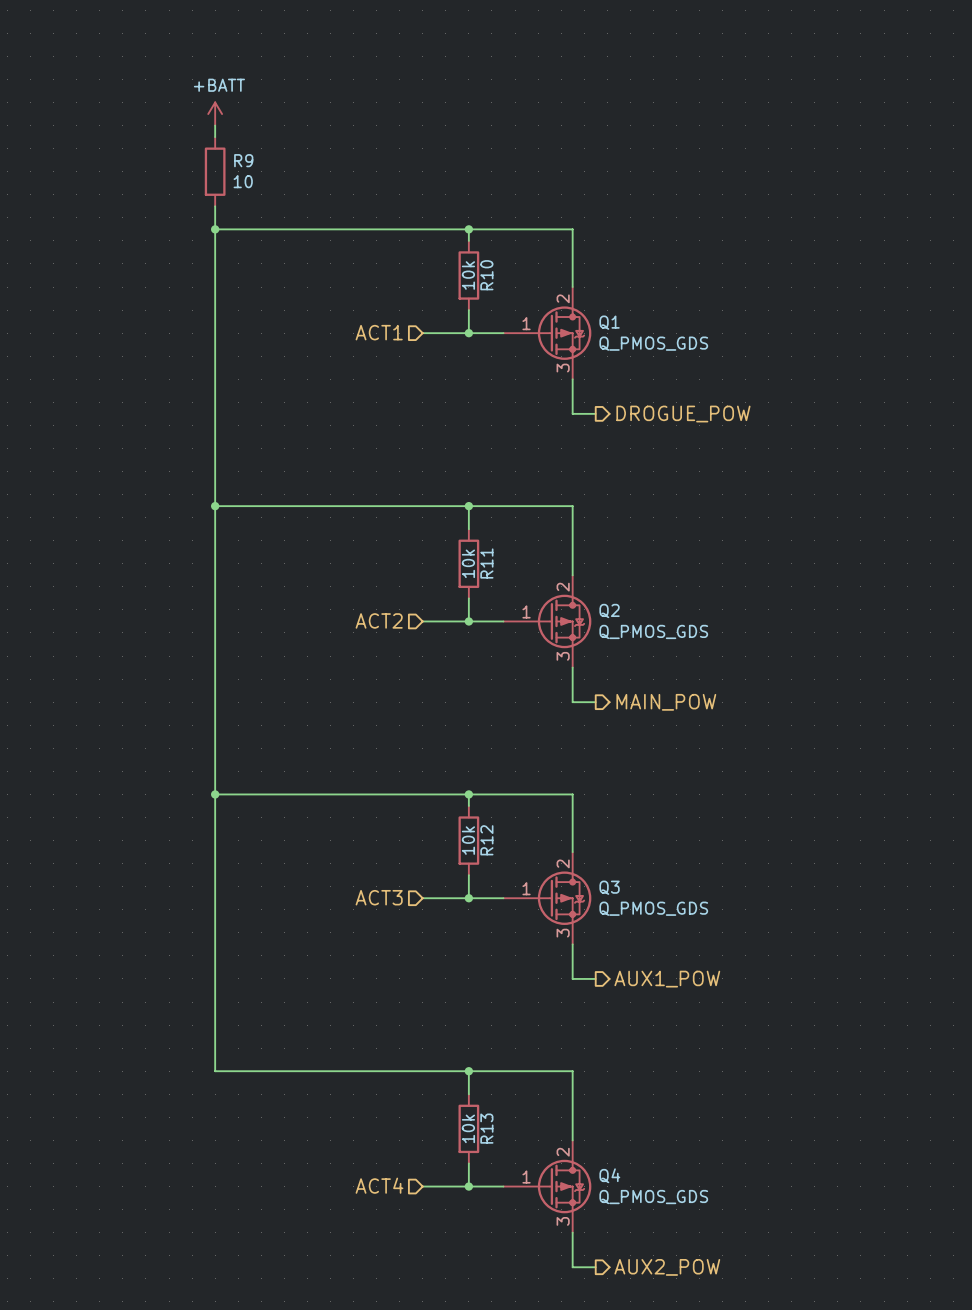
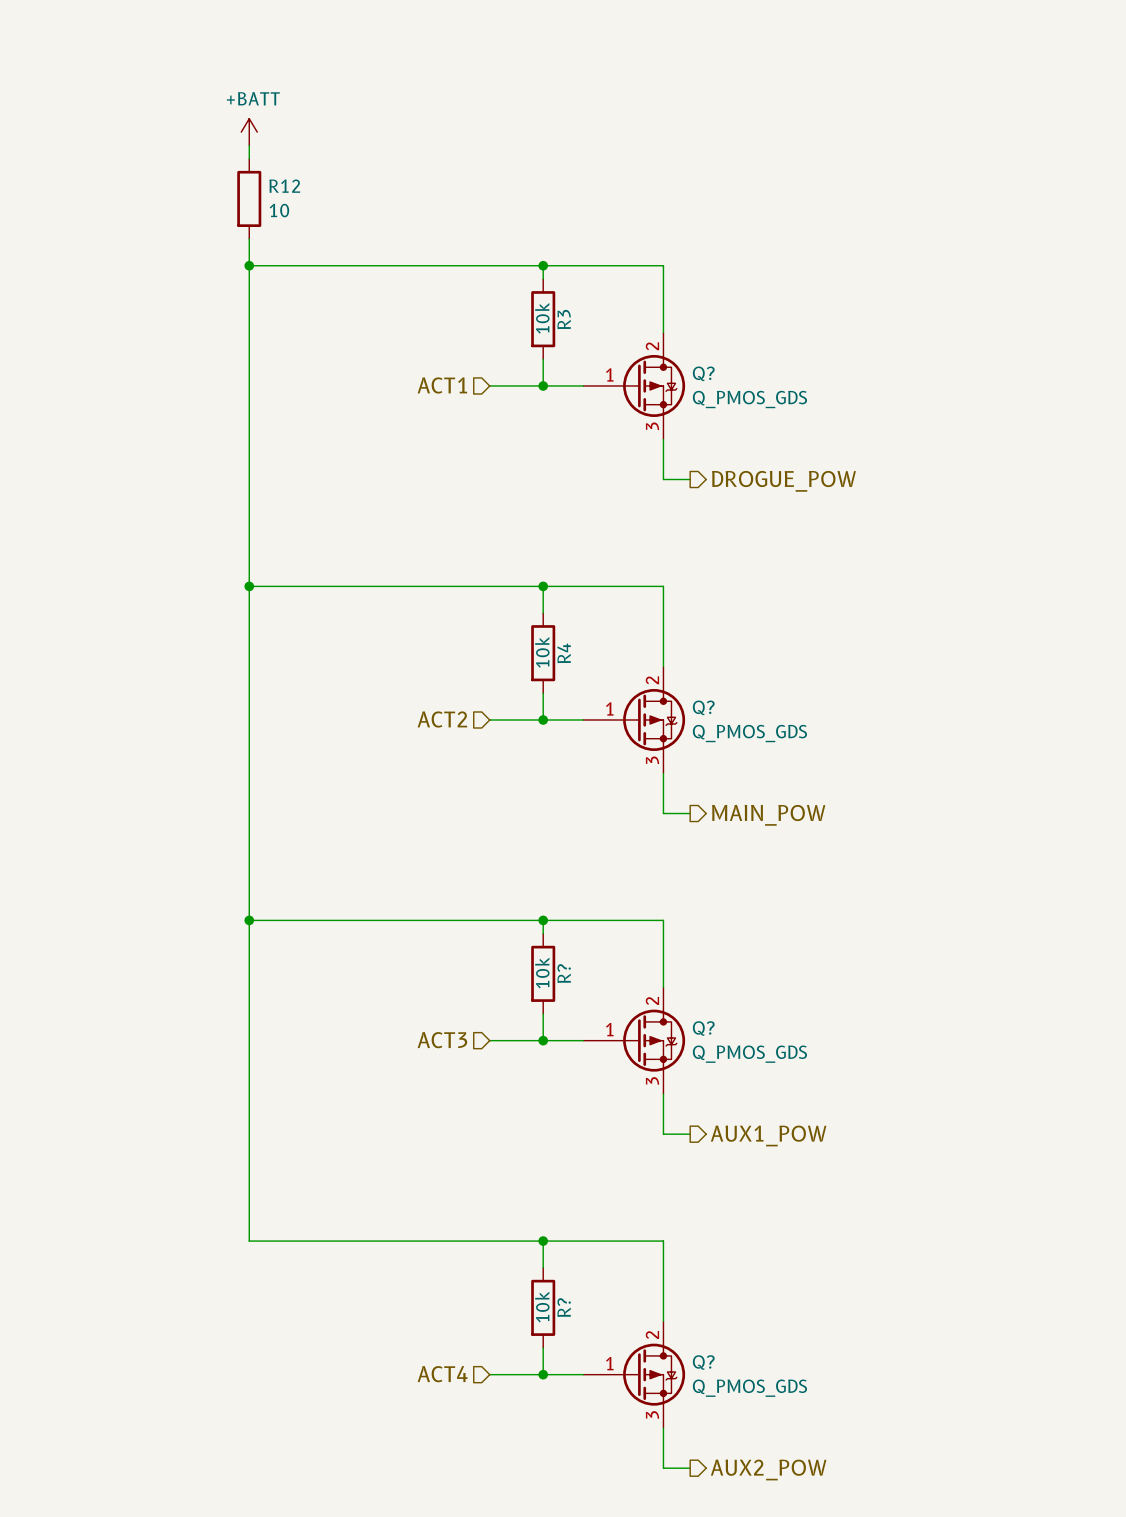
R9 name: R9 (243, 160) -> R12 (284, 186)
R10 name: R10 (486, 275) -> R3 (564, 319)
Q1 name: Q1 (609, 322) -> Q? (703, 373)
R11 name: R11 (486, 563) -> R4 (564, 653)
Q2 name: Q2 (609, 610) -> Q? (703, 707)
R12 name: R12 (486, 840) -> R? (564, 973)
Q3 name: Q3 (609, 887) -> Q? (703, 1028)
R13 name: R13 (486, 1128) -> R? (564, 1307)
Q4 name: Q4 (609, 1175) -> Q? (703, 1362)

